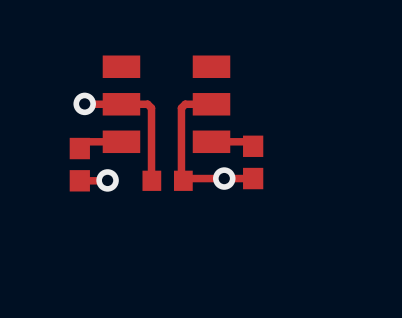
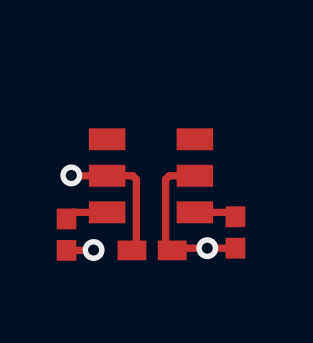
part footprint: [142, 170, 193, 191] -> [117, 240, 187, 261]

